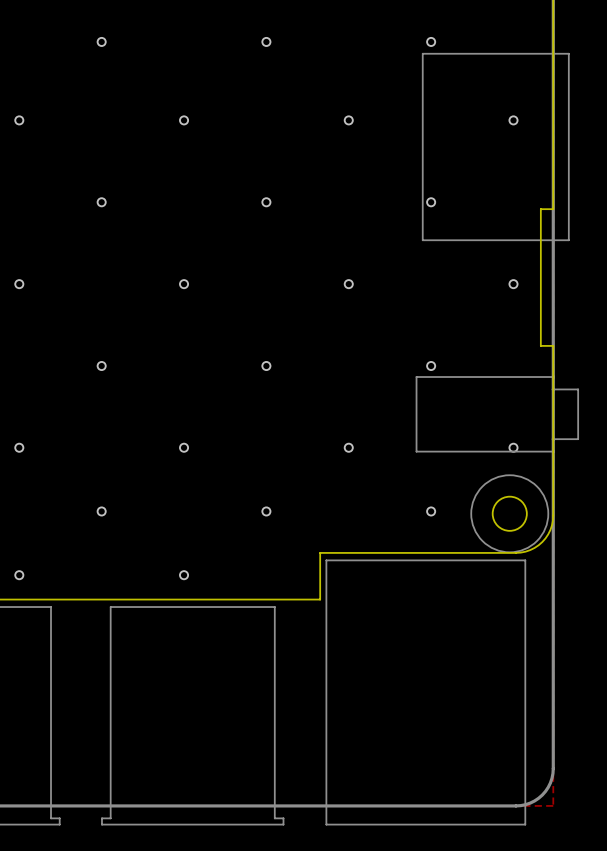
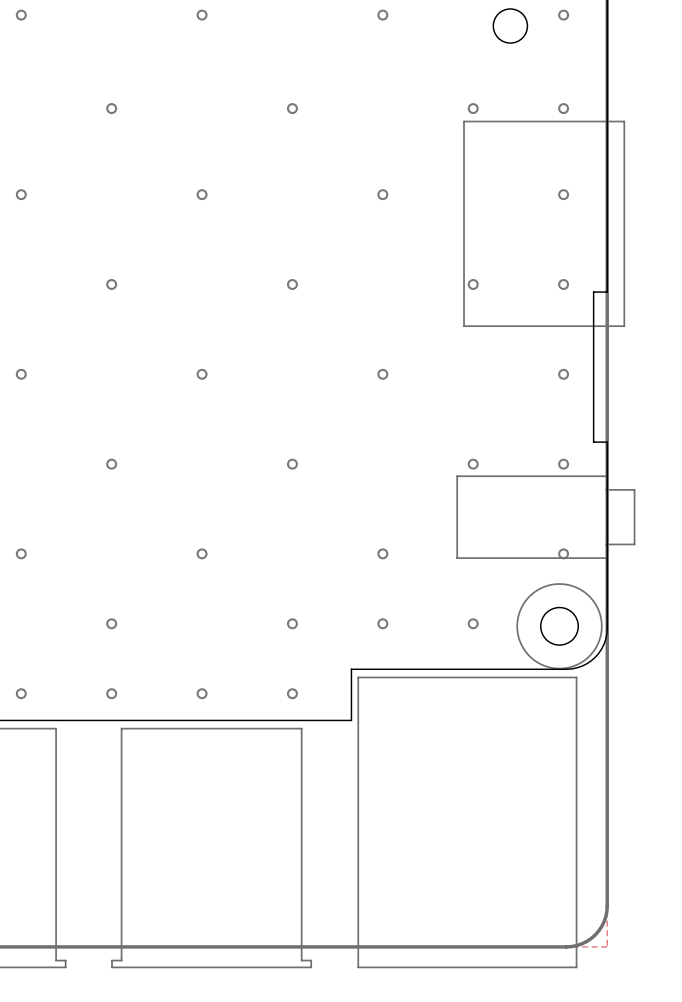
via: none -> (563, 108)
via: none -> (563, 284)
via: none -> (563, 464)
via: none -> (382, 623)
via: none -> (111, 693)
via: none -> (292, 693)

